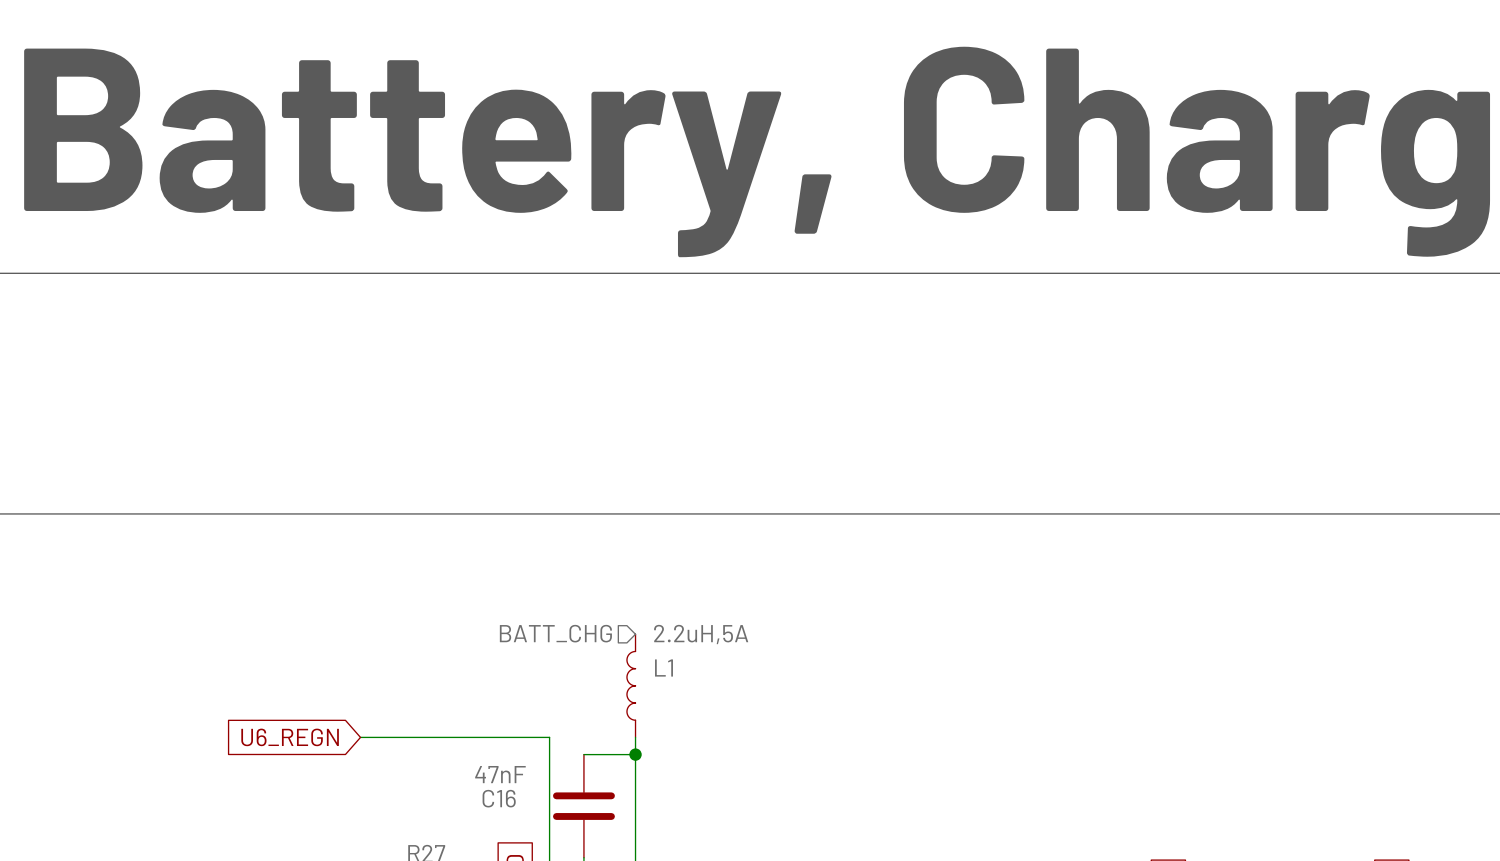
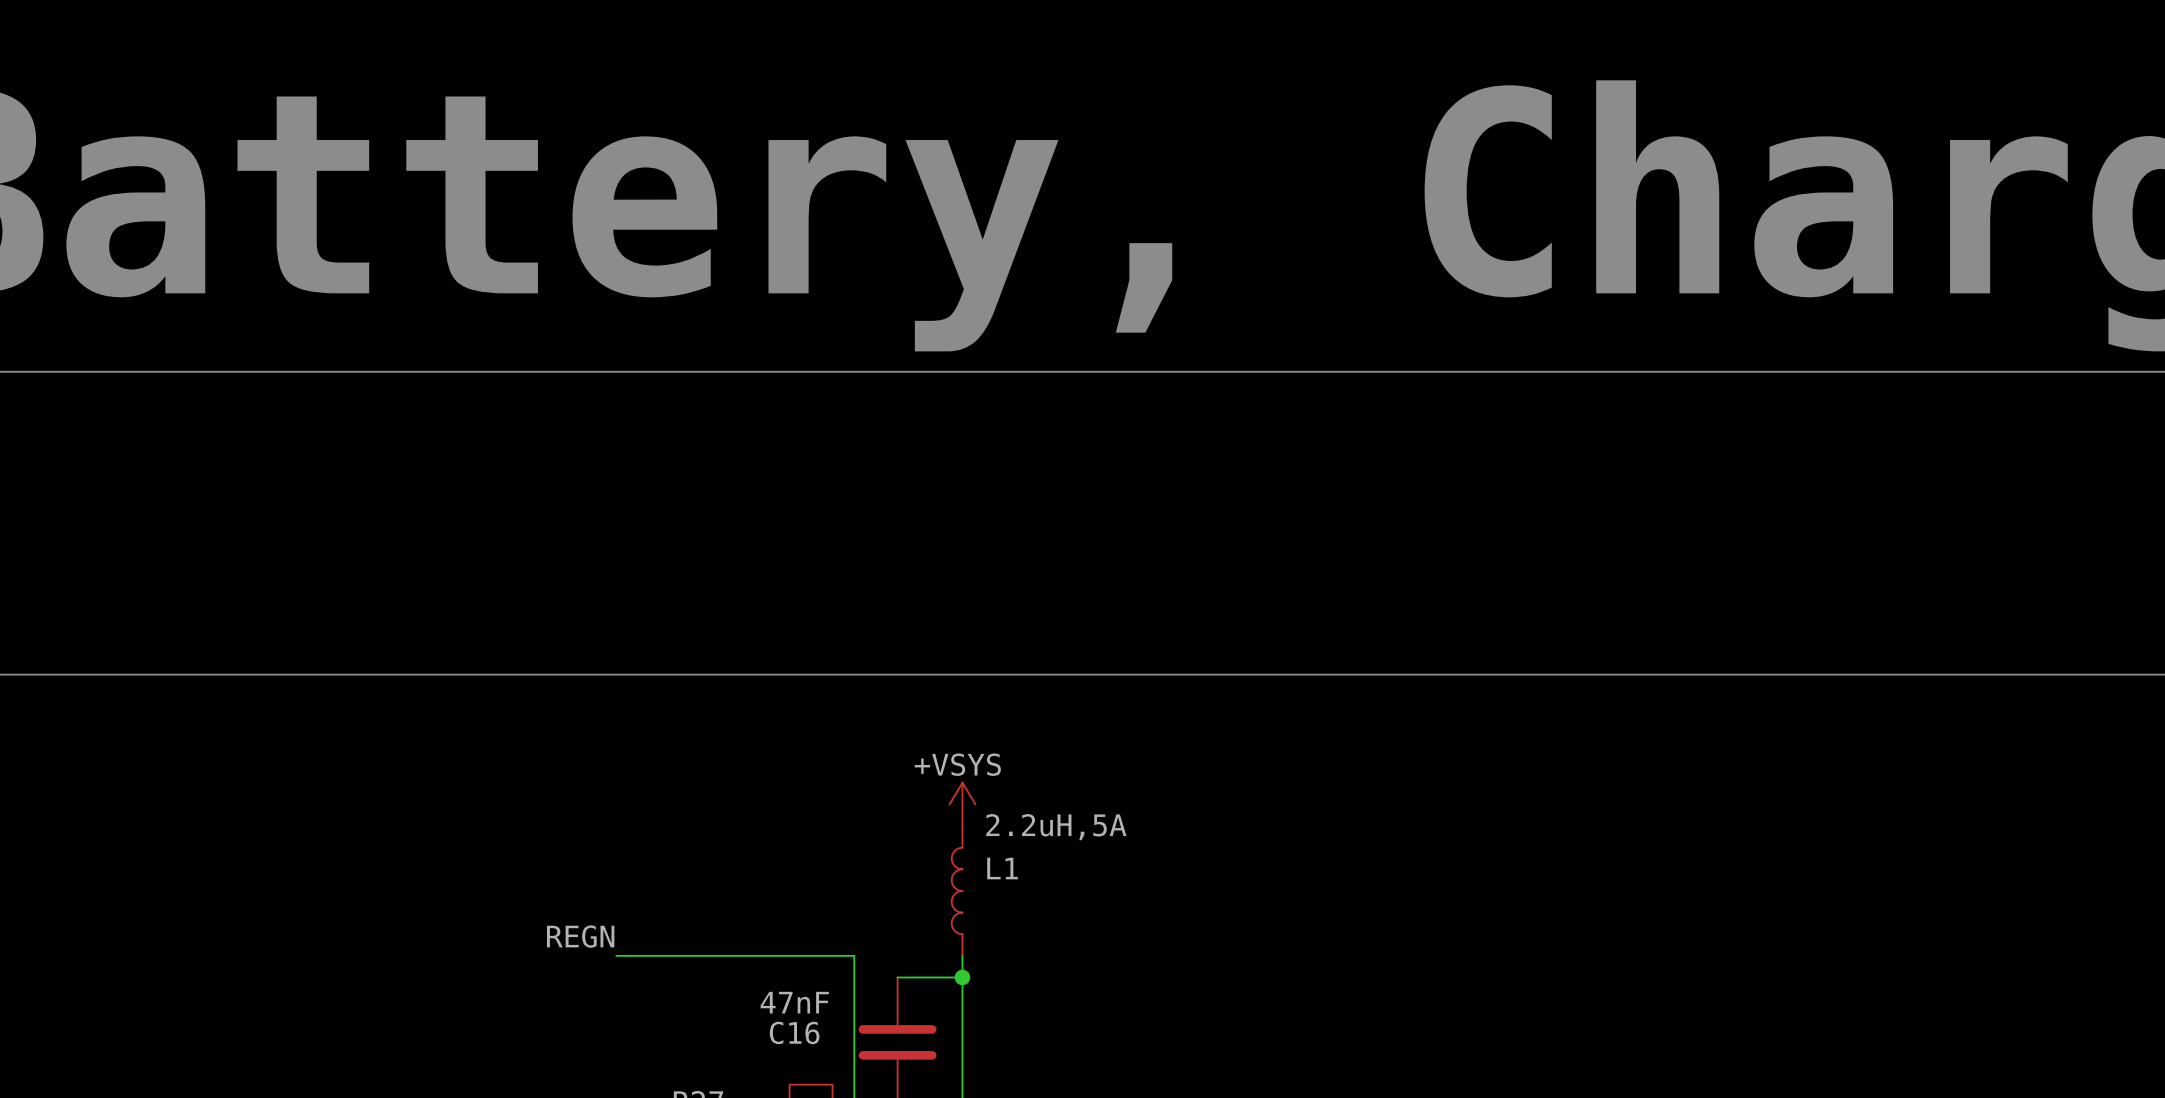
power symbol: none -> +VSYS (962, 804)
hierarchical label: BATT_CHG (555, 633) -> none
label: none -> REGN (580, 936)
global label: U6_REGN (290, 737) -> none

